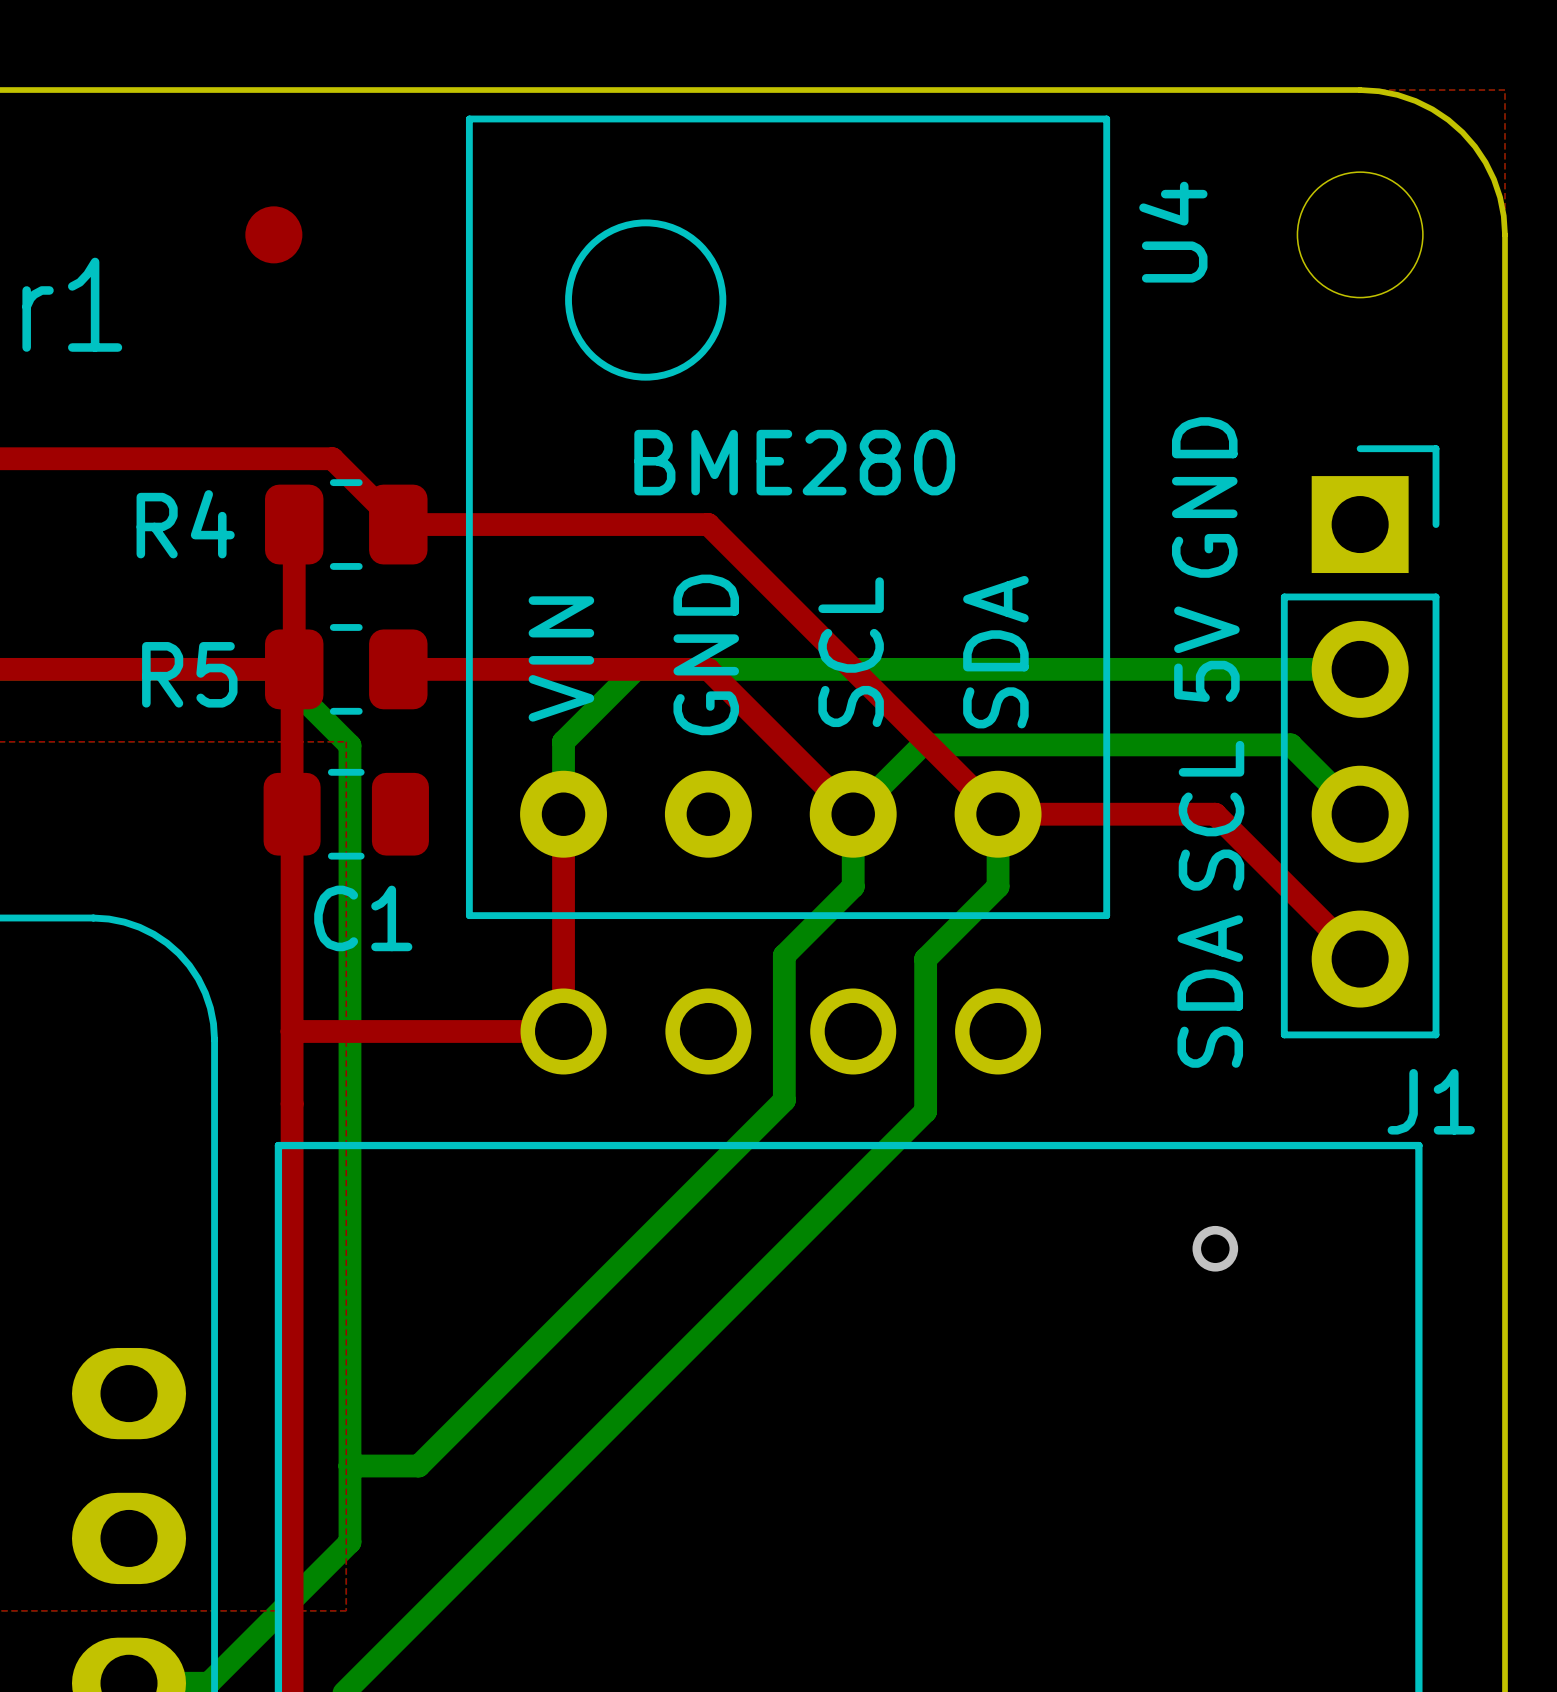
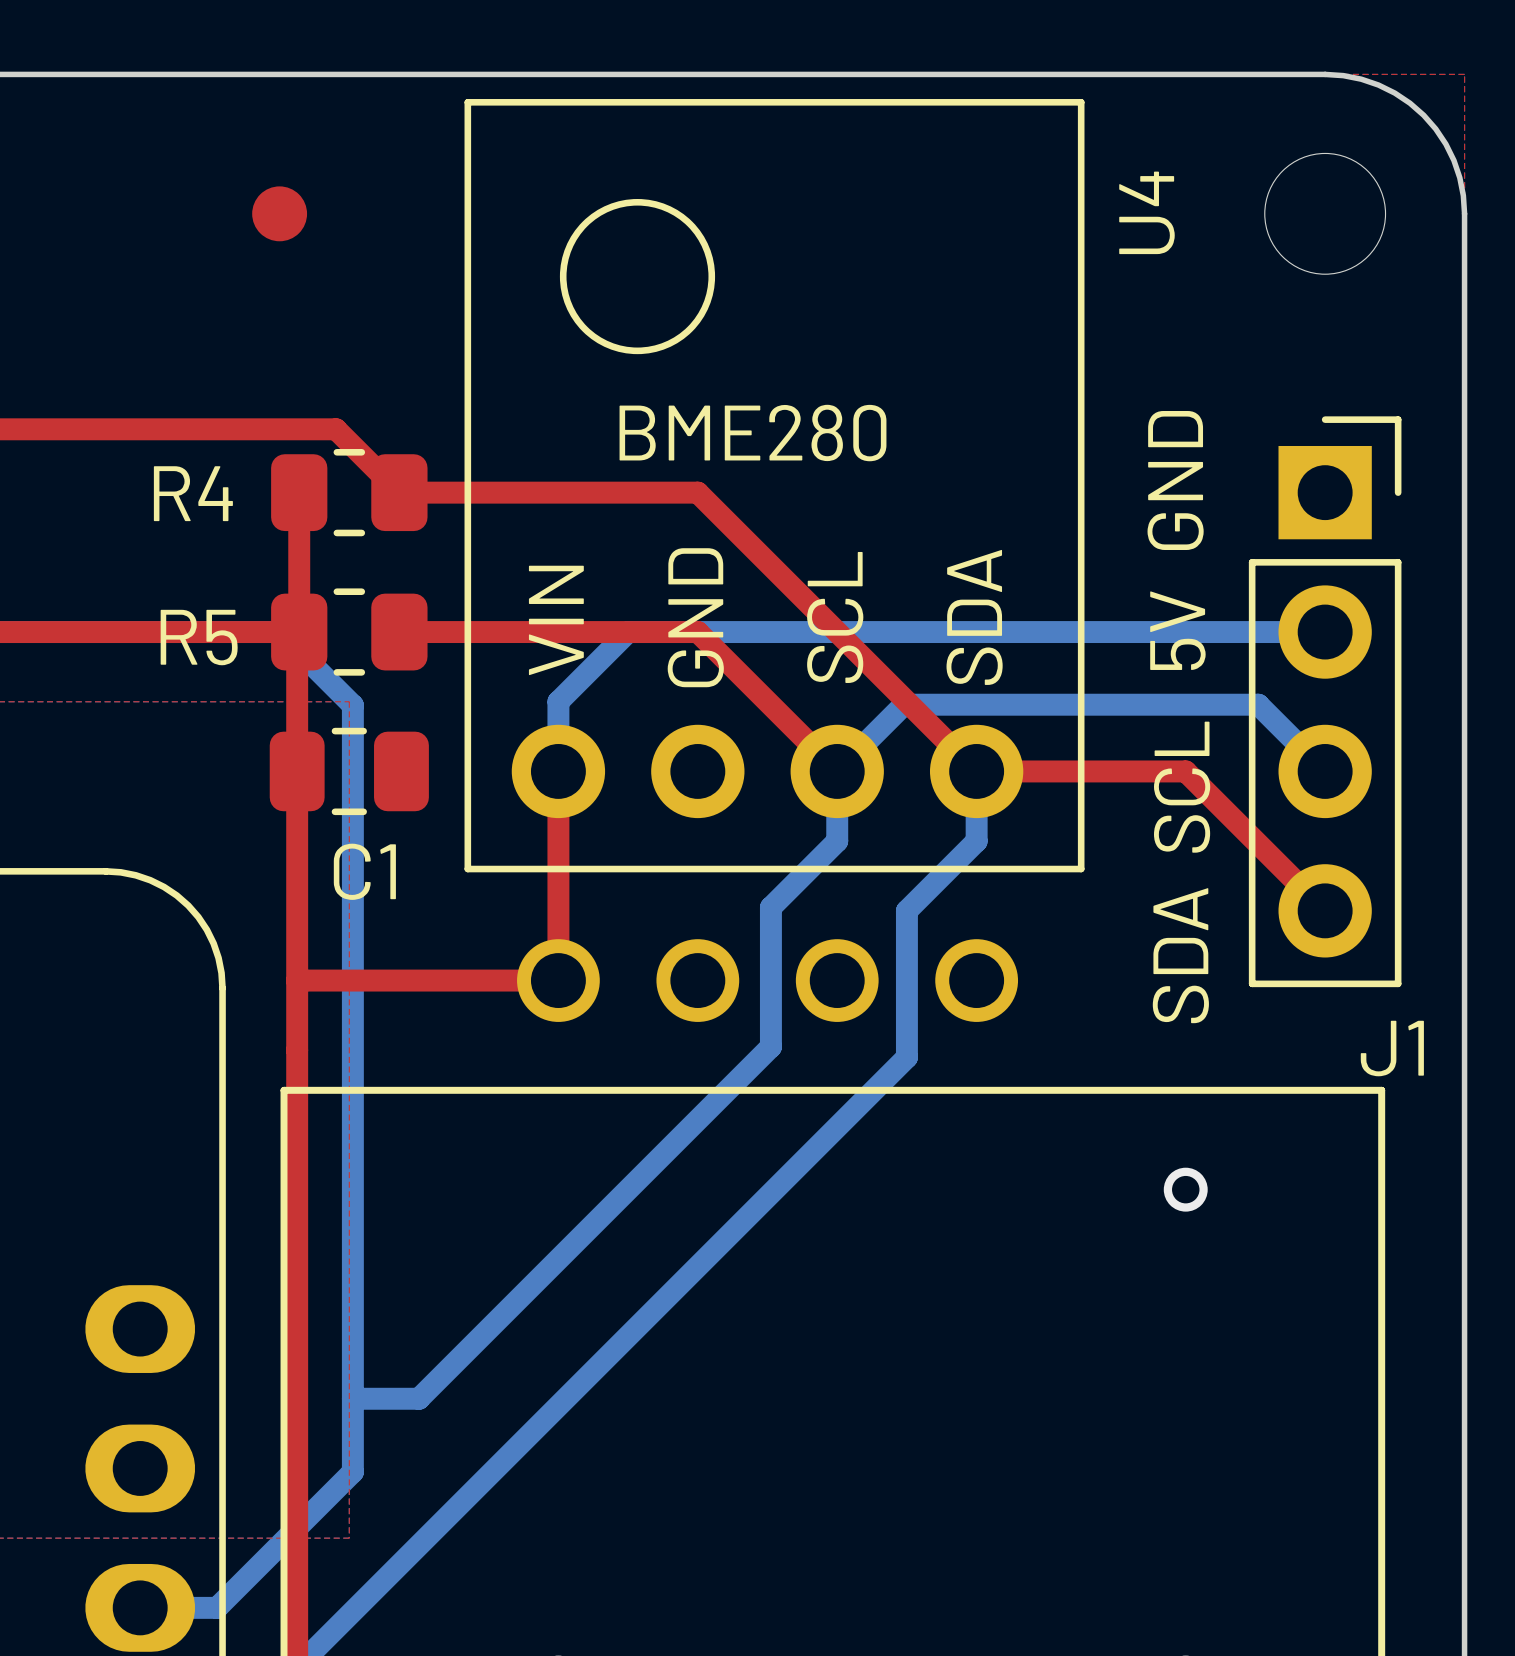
U4 footprint: [465, 115, 1111, 920] -> [464, 99, 1085, 873]

